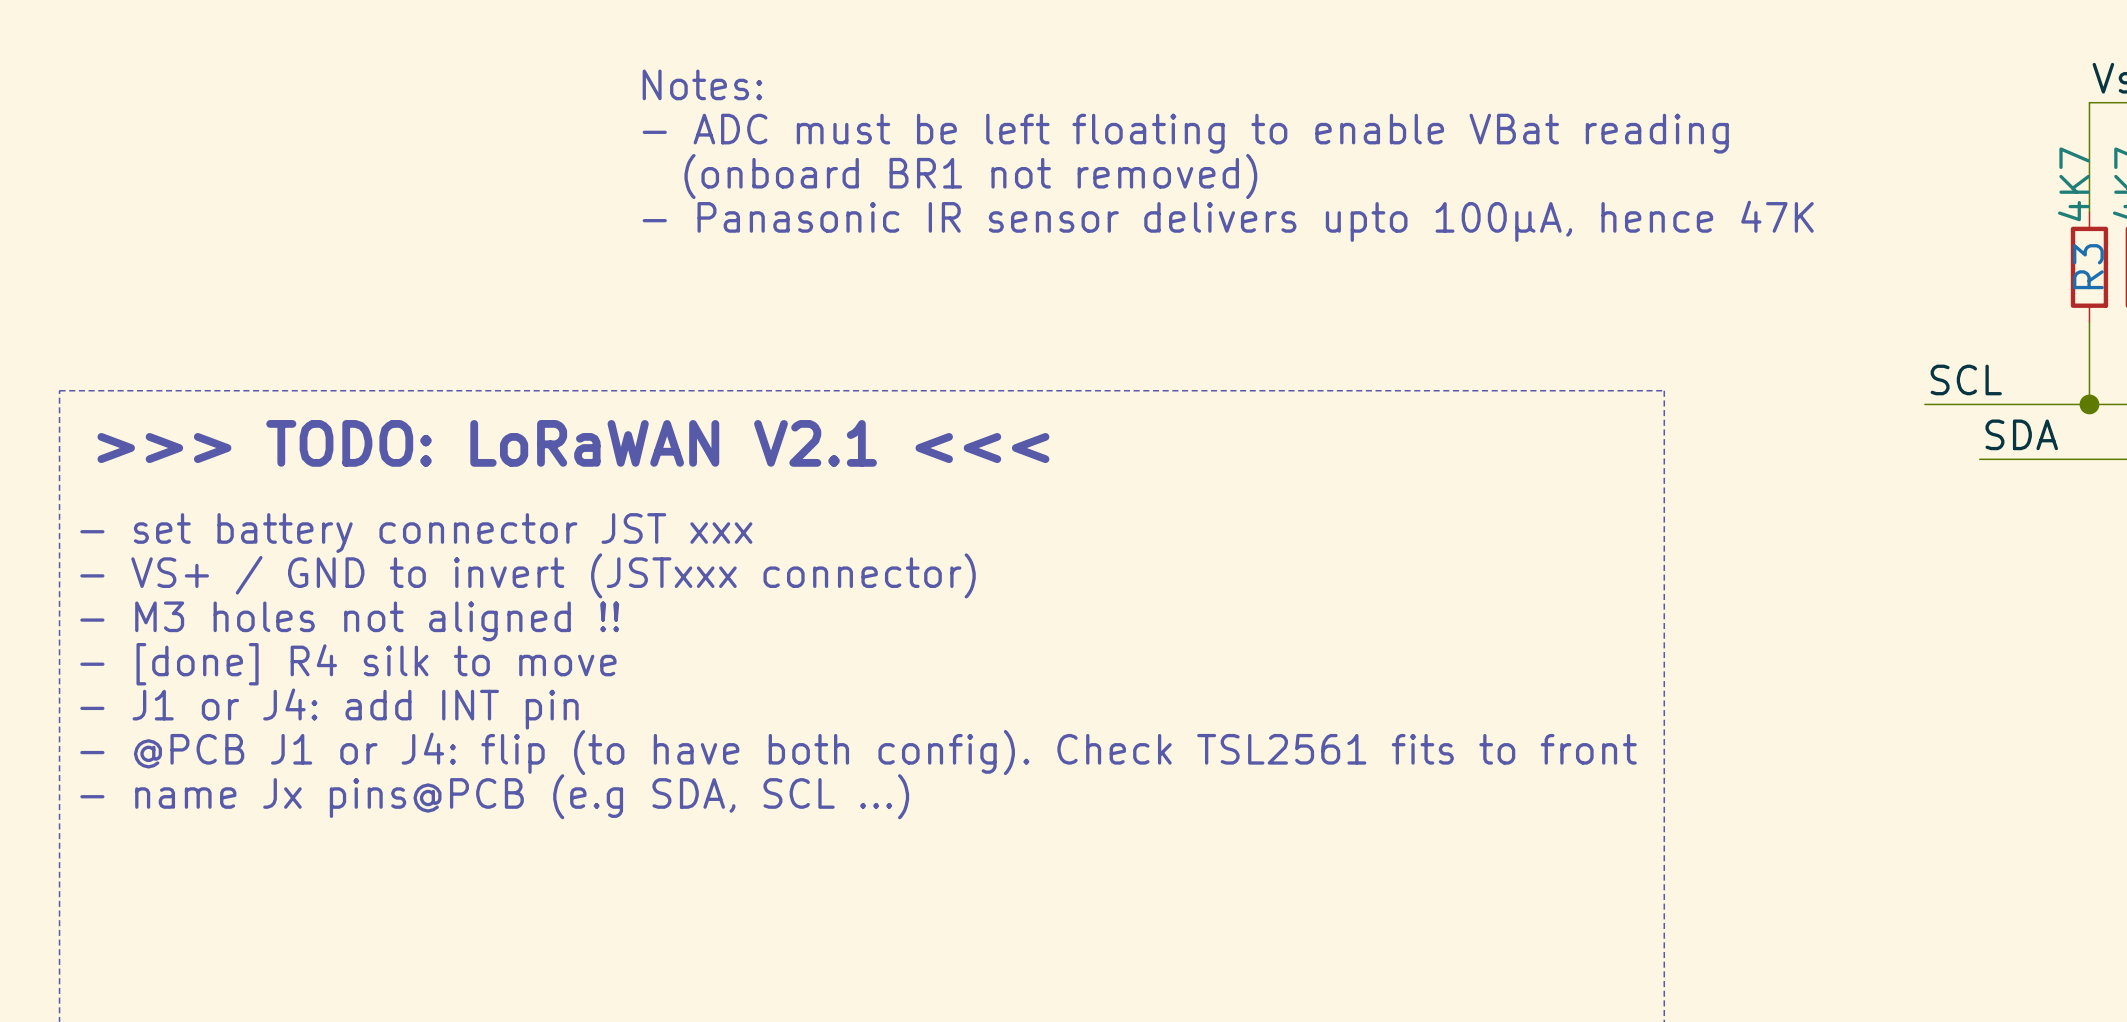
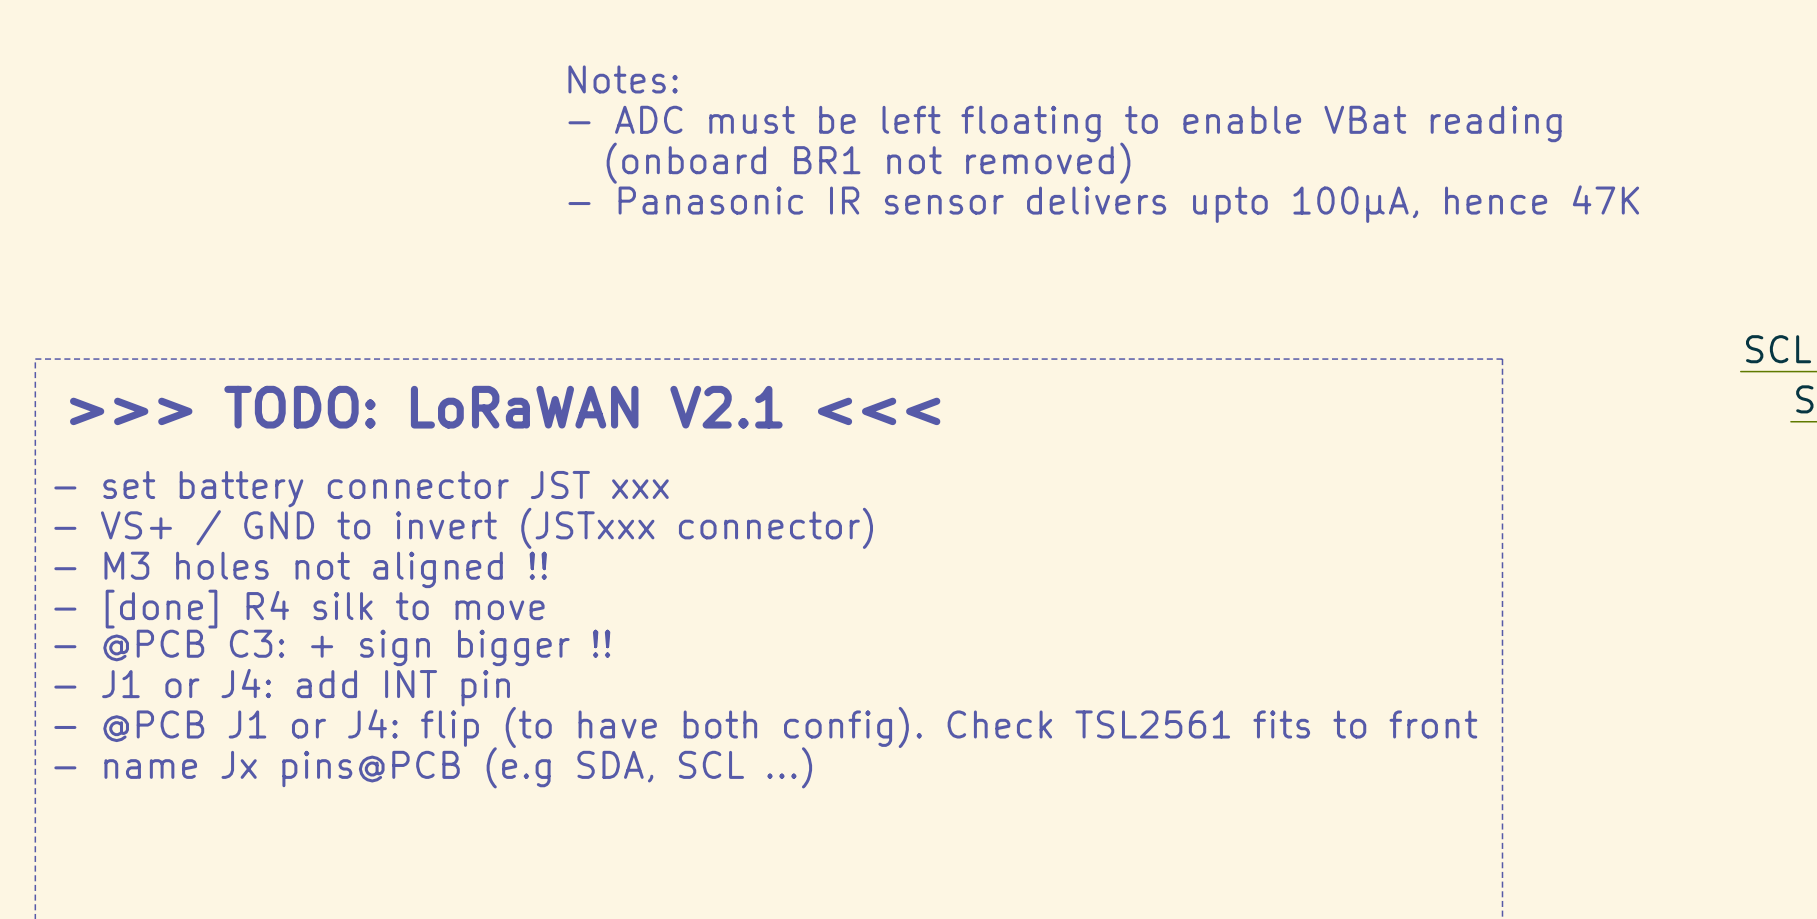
text: none -> - @PCB C3: + sign bigger !! (332, 647)
text position: - J1 or J4: add INT pin (329, 709) -> - J1 or J4: add INT pin (282, 687)
text position: - @PCB J1 or J4: flip (to have both config). Check TSL2561 fits to front (858, 752) -> - @PCB J1 or J4: flip (to have both config). Check TSL2561 fits to front (765, 727)
text position: - name Jx pins@PCB (e.g SDA, SCL ...) (494, 796) -> - name Jx pins@PCB (e.g SDA, SCL ...) (433, 767)

